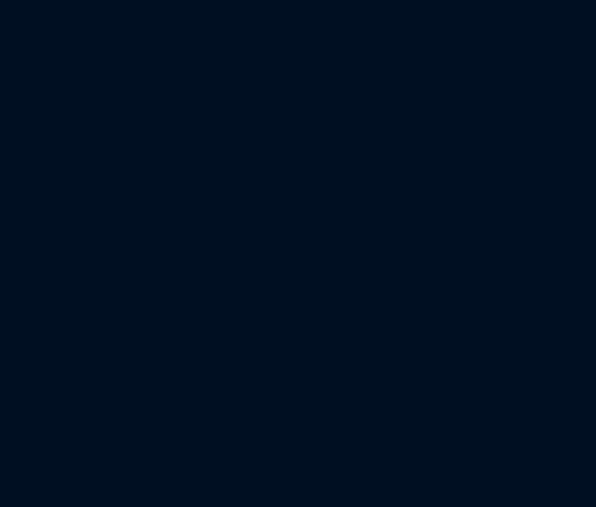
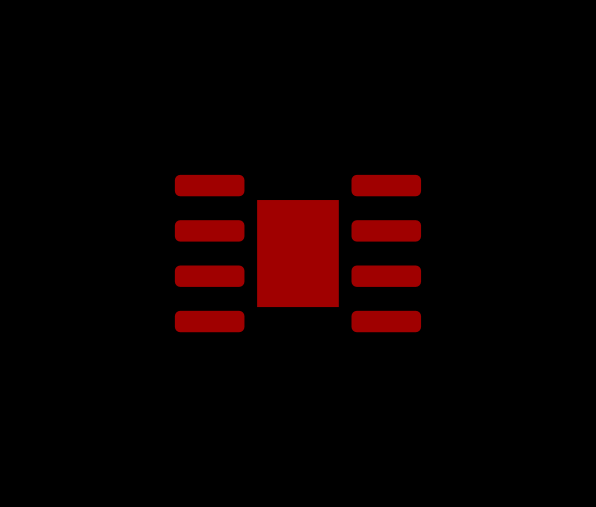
part: none -> (297, 253)

